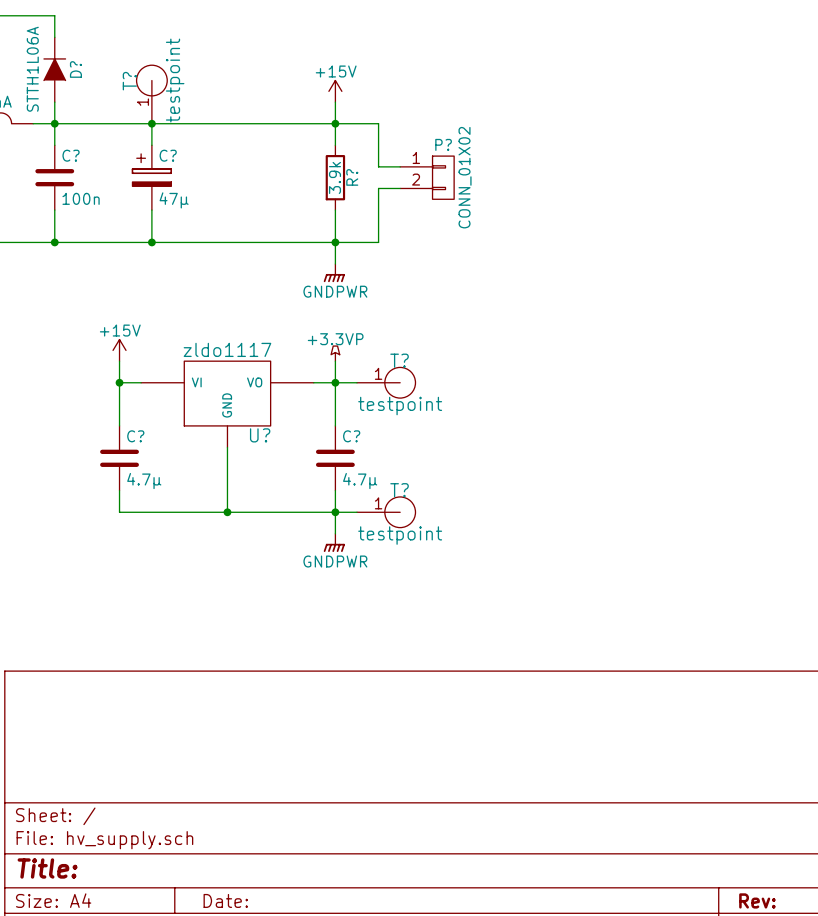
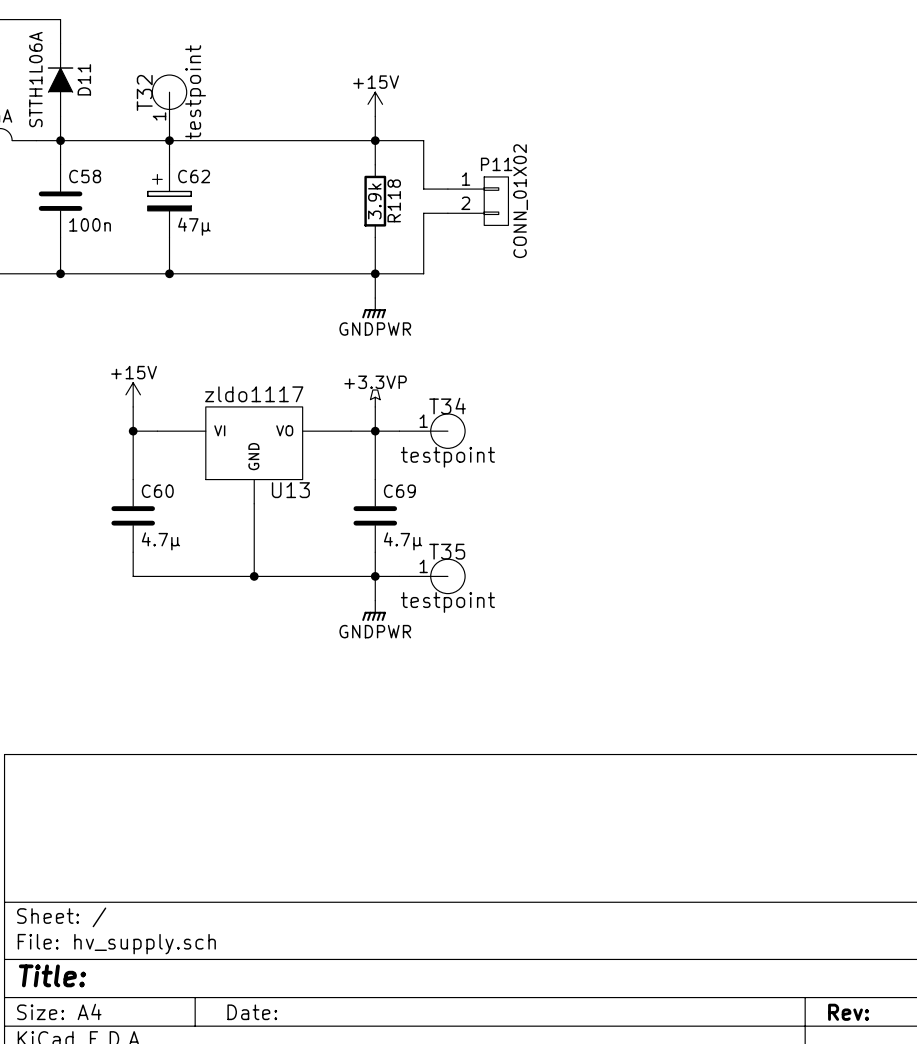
D? name: D? (75, 69) -> D11 (84, 79)
T? name: T? (129, 81) -> T32 (144, 92)
P? name: P? (443, 144) -> P11 (496, 164)
C? name: C? (71, 155) -> C58 (85, 176)
C? name: C? (168, 155) -> C62 (194, 176)
R? name: R? (352, 177) -> R118 (394, 200)
T? name: T? (399, 360) -> T34 (447, 406)
U? name: U? (260, 435) -> U13 (290, 490)
C? name: C? (135, 436) -> C60 (157, 491)
C? name: C? (351, 436) -> C69 (399, 491)
T? name: T? (399, 490) -> T35 (447, 551)

